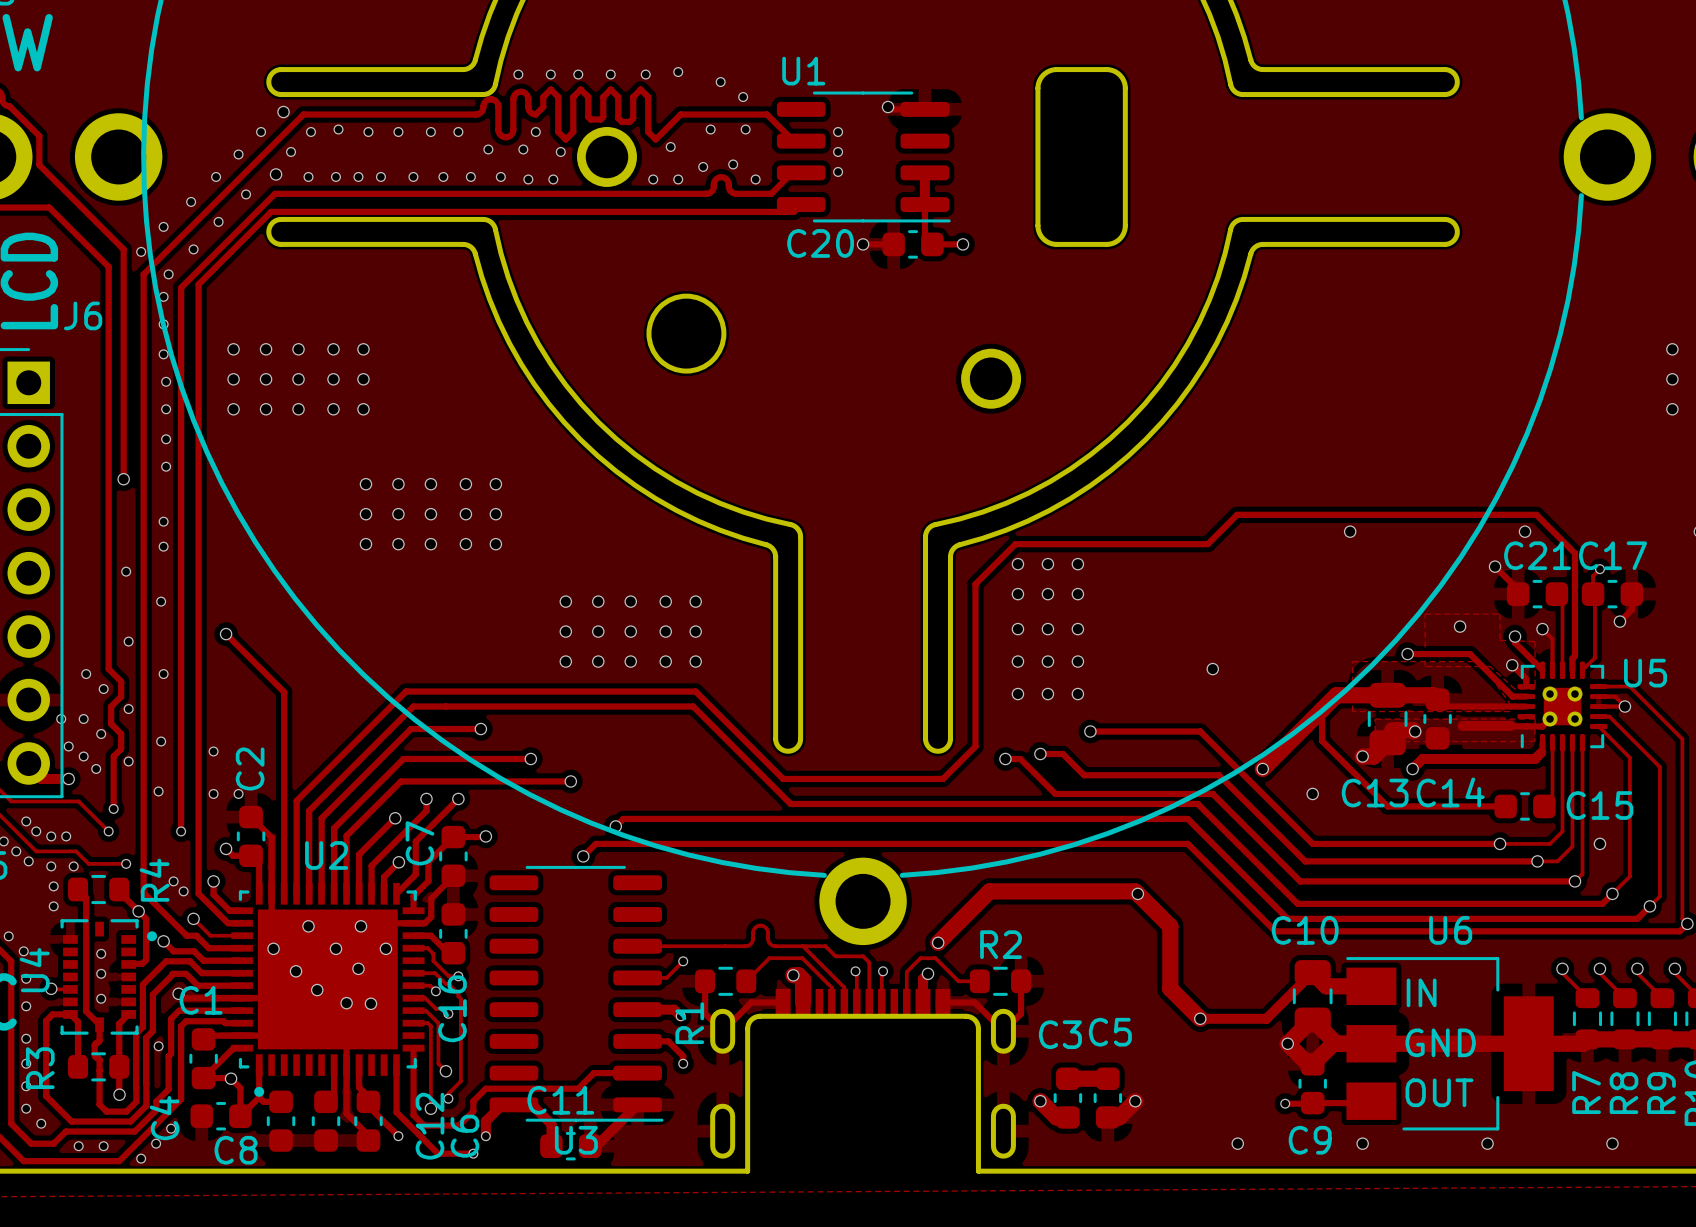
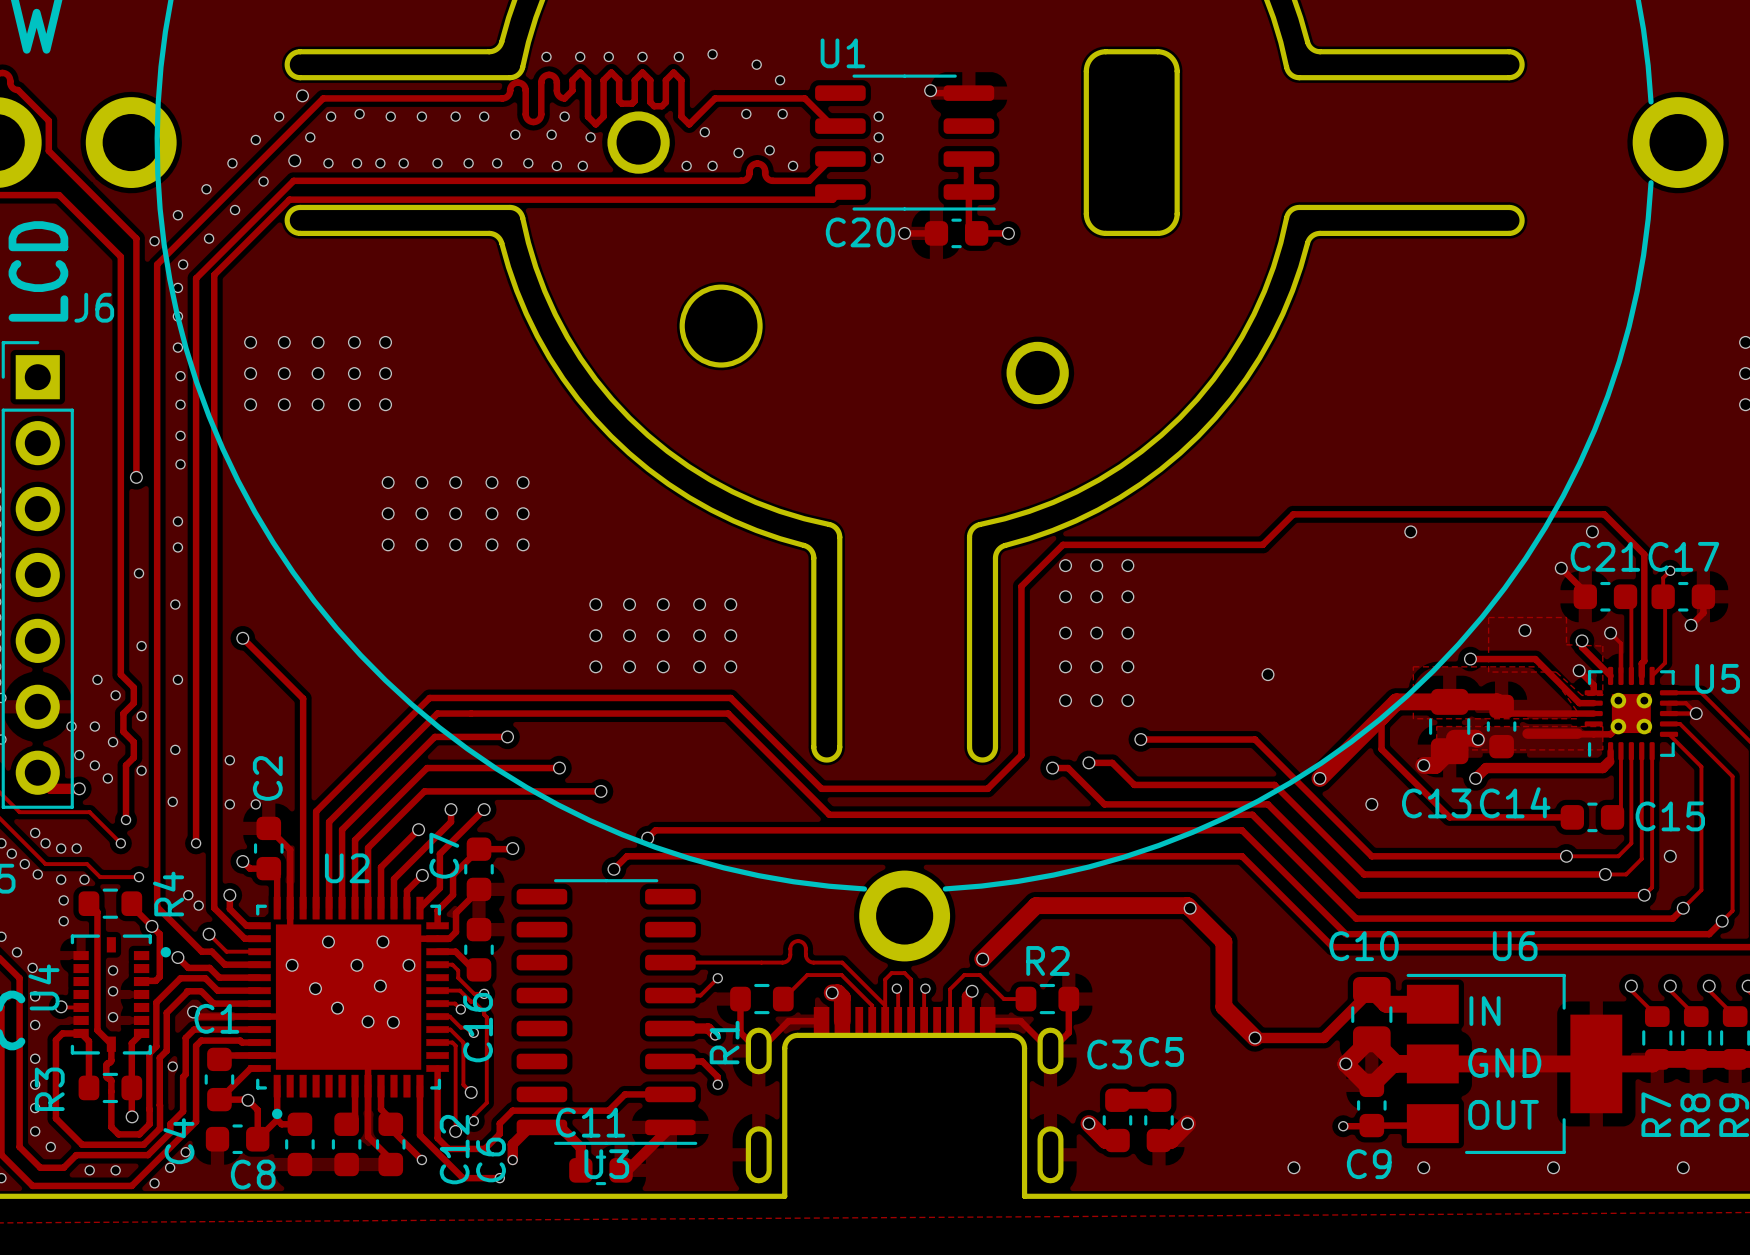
track: (802, 946) (825, 946) (835, 956) (850, 956) -> (885, 1005) (885, 979) (891, 973)

